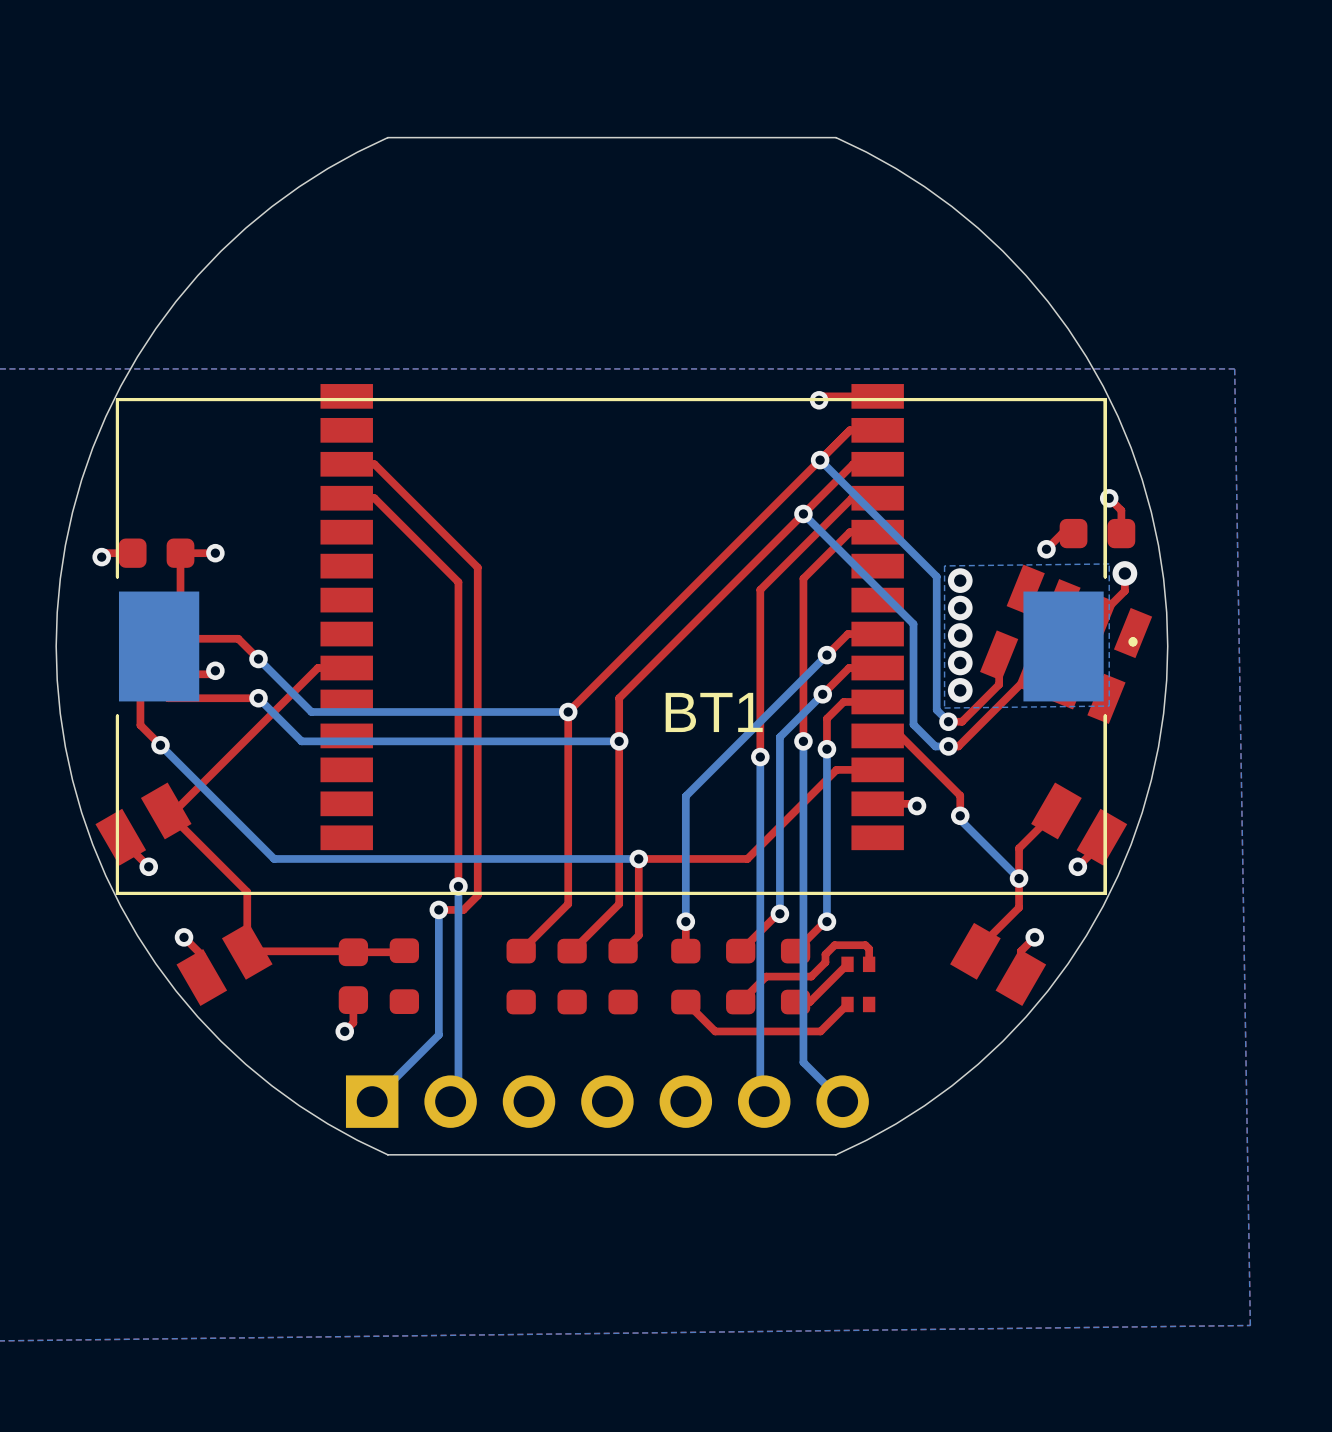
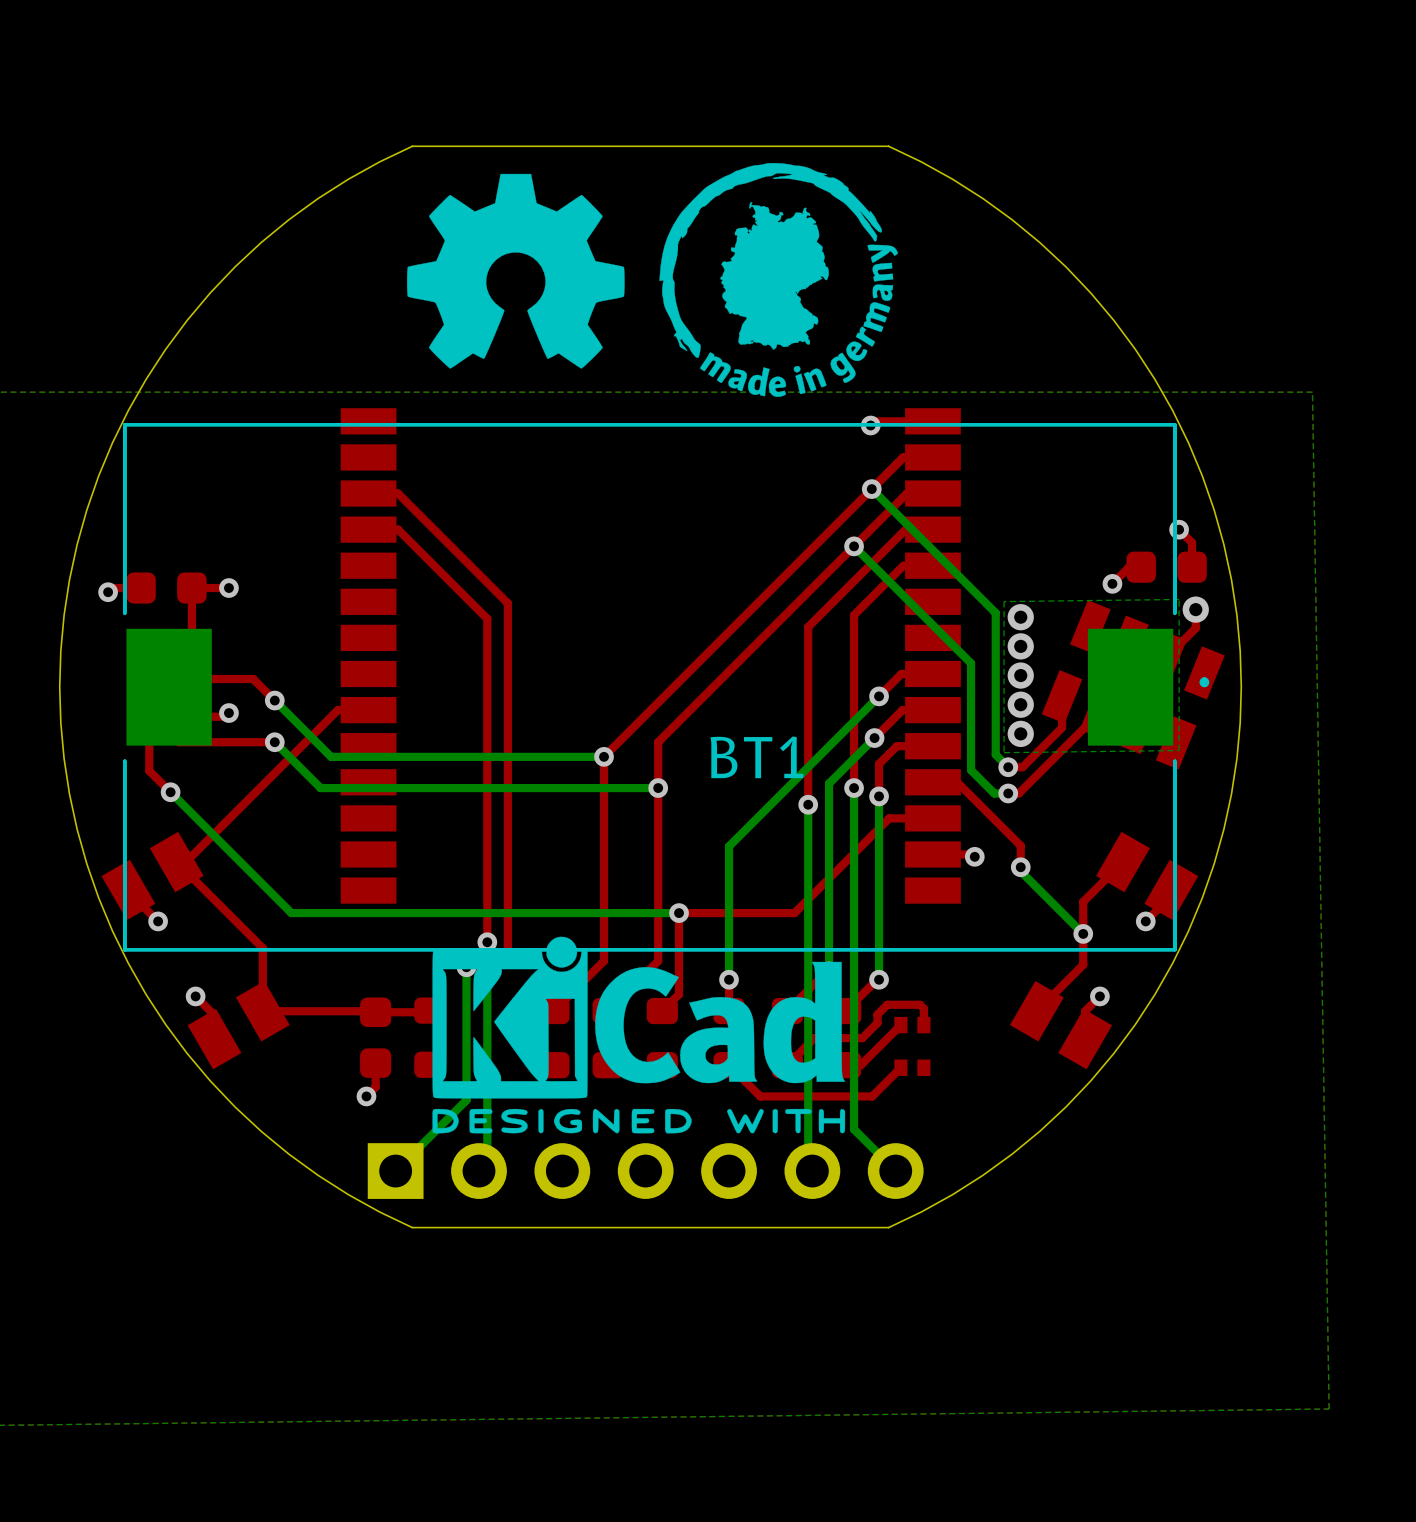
drawing: none -> [407, 163, 898, 397]
drawing: none -> [432, 936, 846, 1134]

